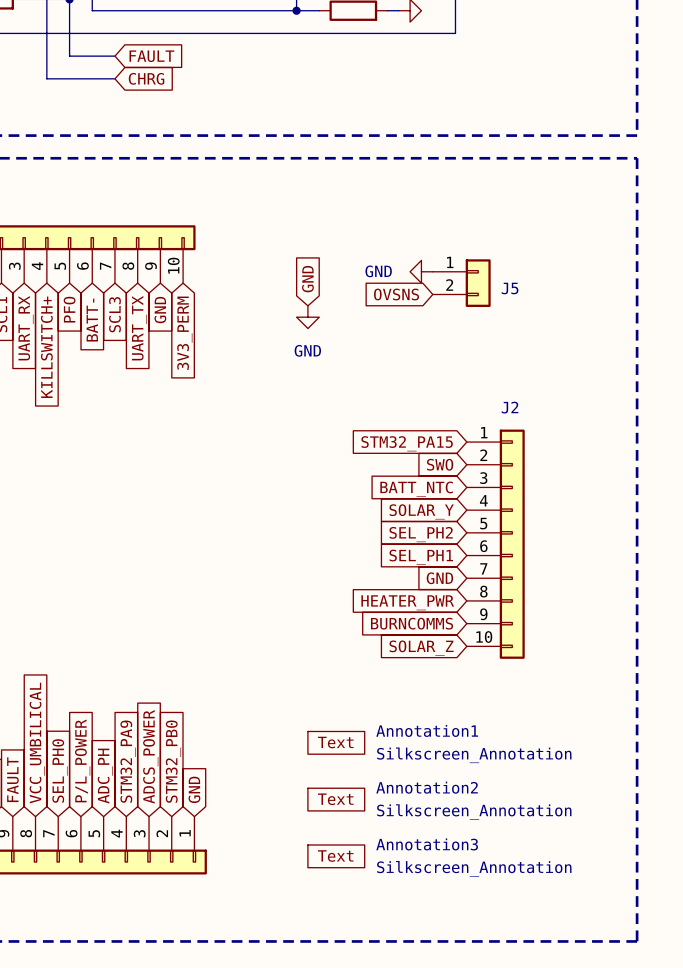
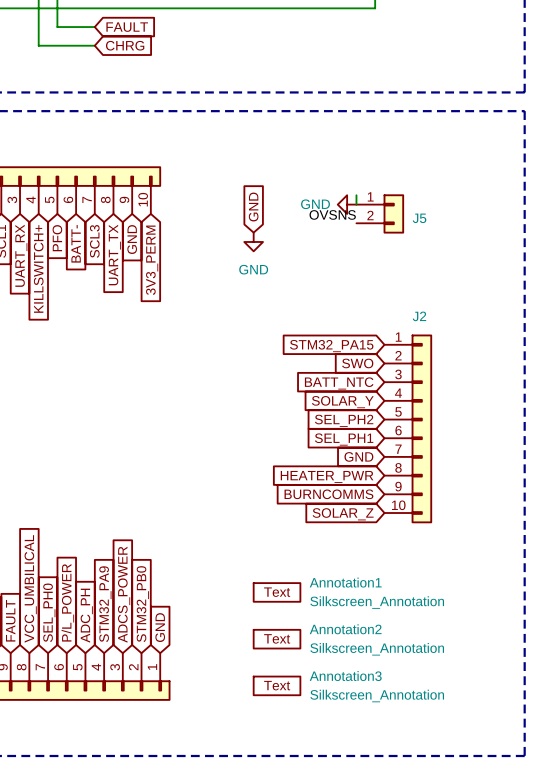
wire: none -> (356, 195) (356, 204)
label: none -> OVSNS (332, 214)
global label: OVSNS (396, 294) -> none

